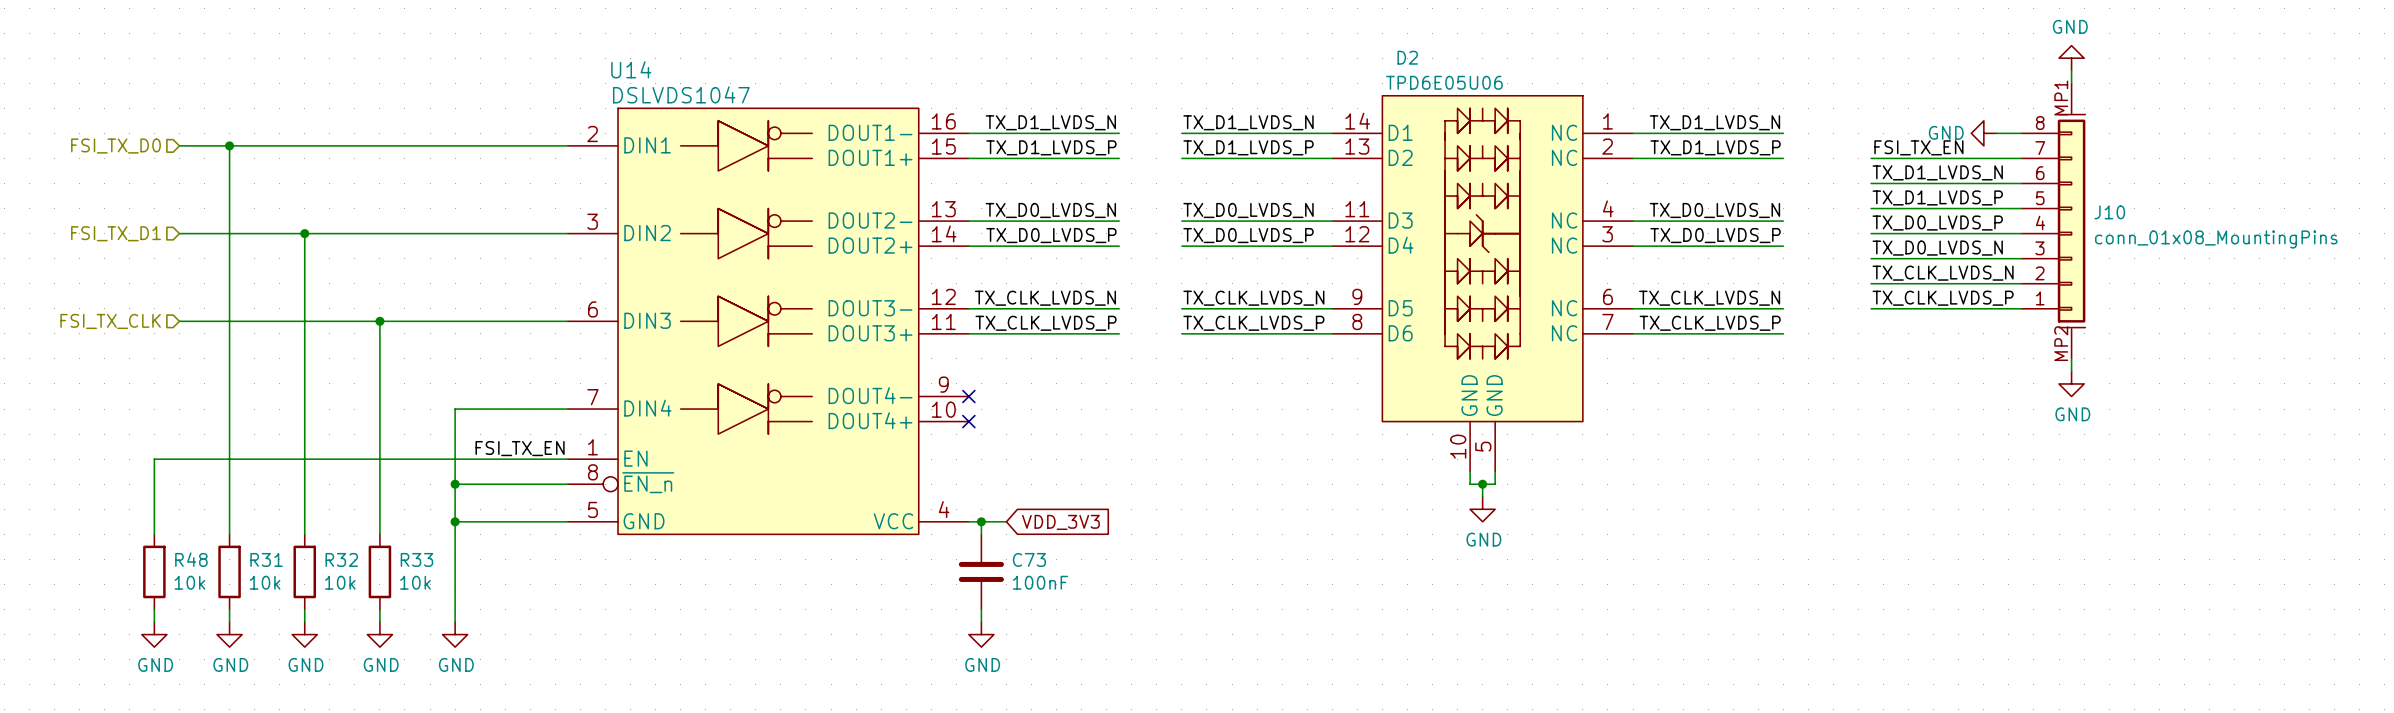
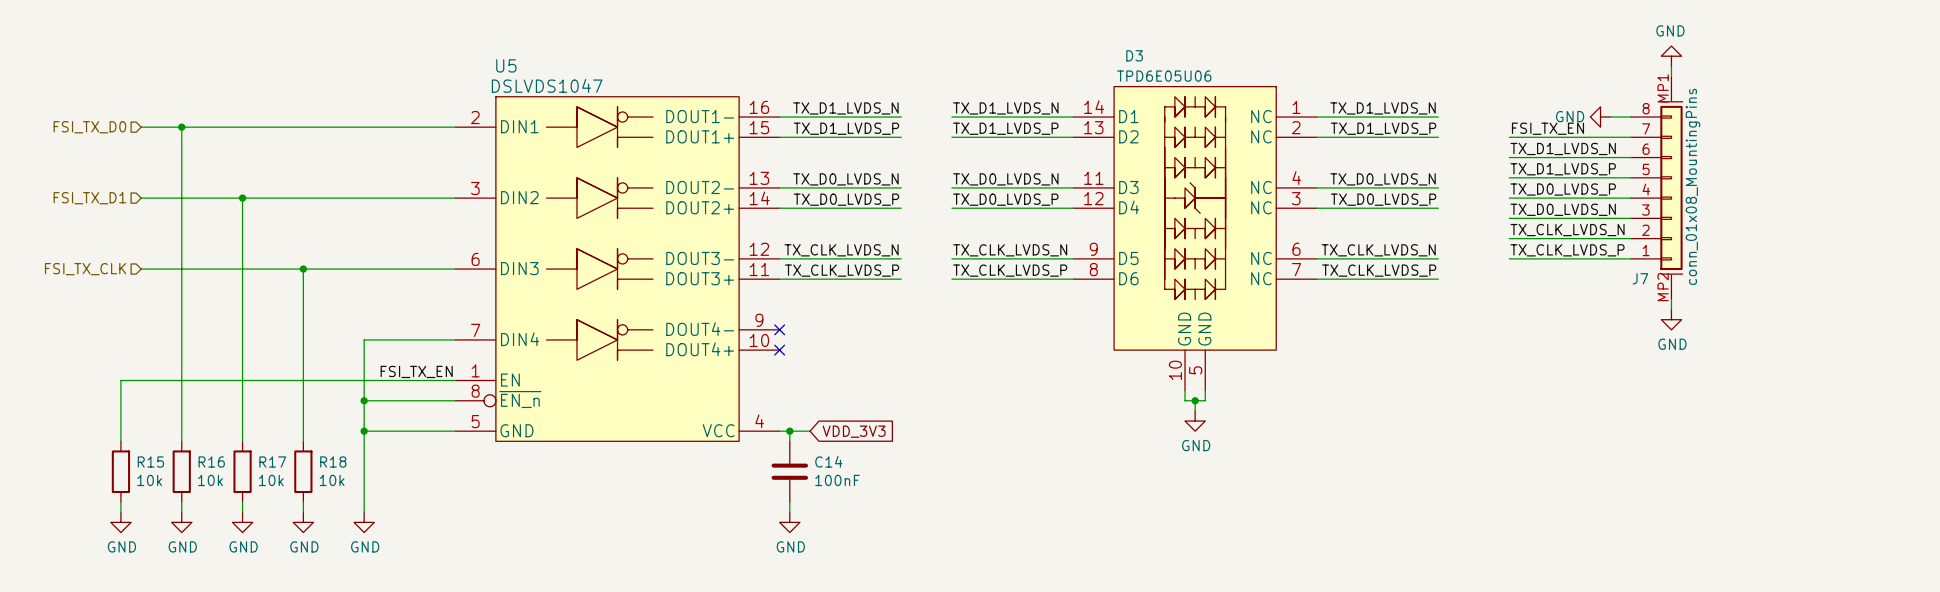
D2 name: D2 (1407, 57) -> D3 (1134, 55)
U14 name: U14 (631, 69) -> U5 (506, 65)
J10 name: J10 (2109, 212) -> J7 (1640, 278)
J10 value rotation: 0° (2216, 239) -> 90° counterclockwise (1693, 186)
R48 name: R48 (191, 559) -> R15 (150, 462)
R31 name: R31 (266, 559) -> R16 (211, 462)
R32 name: R32 (341, 559) -> R17 (272, 462)
R33 name: R33 (416, 559) -> R18 (333, 462)
C73 name: C73 (1029, 559) -> C14 (828, 461)

